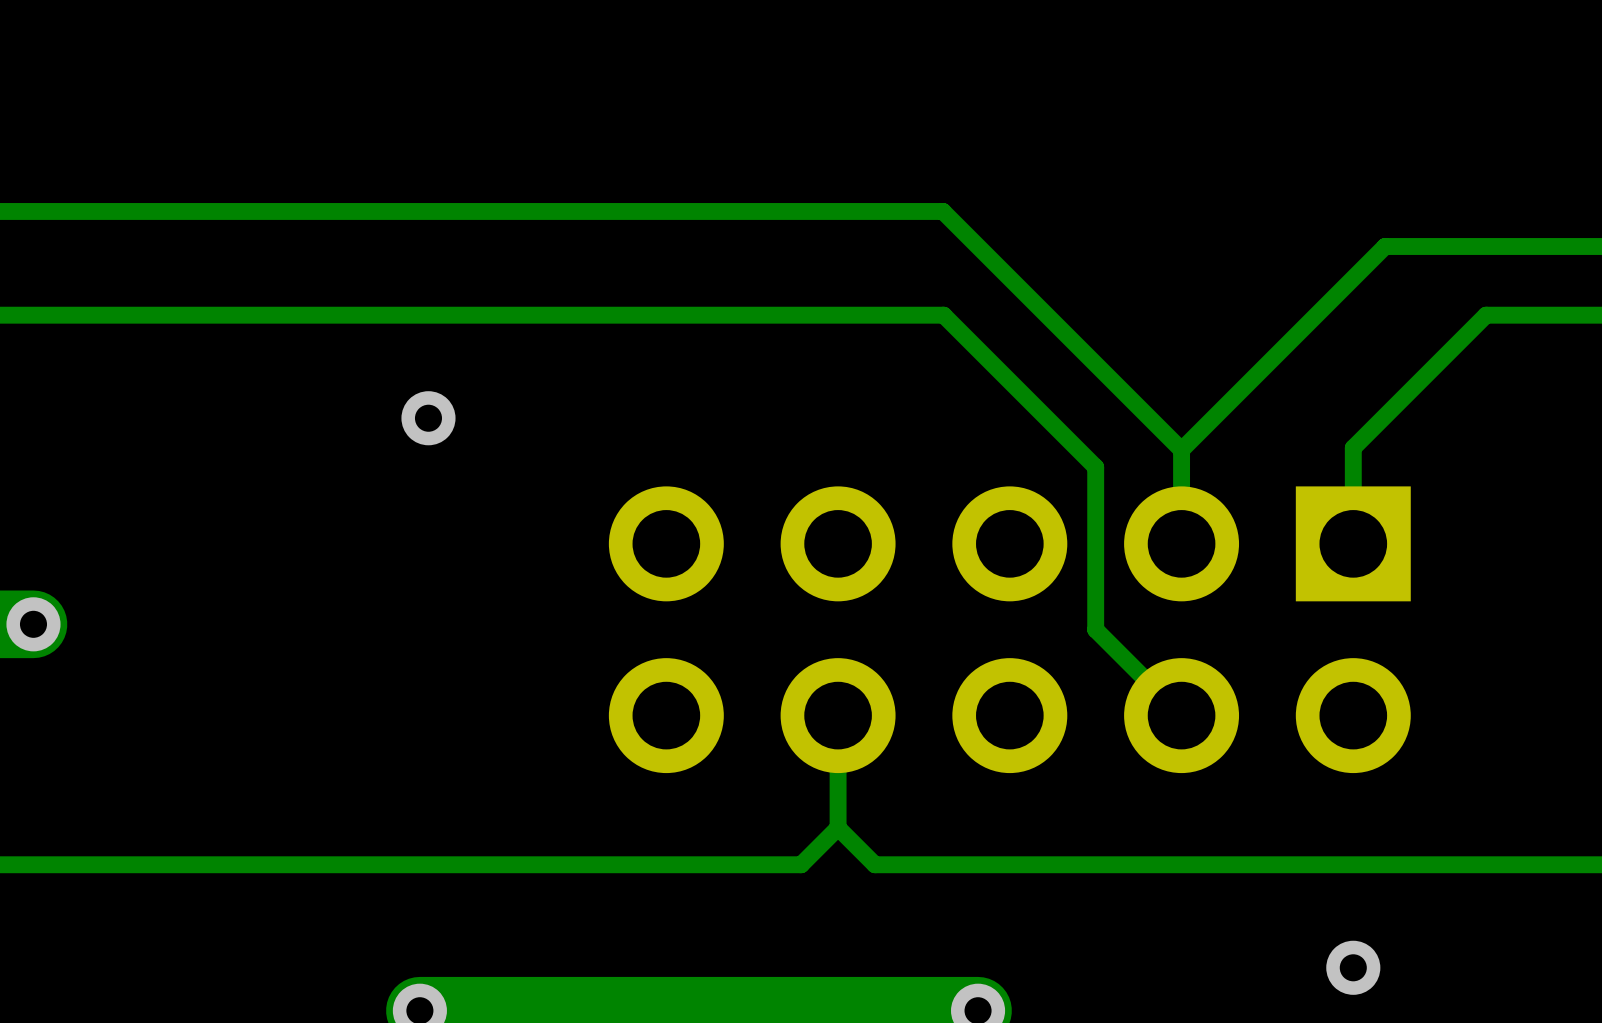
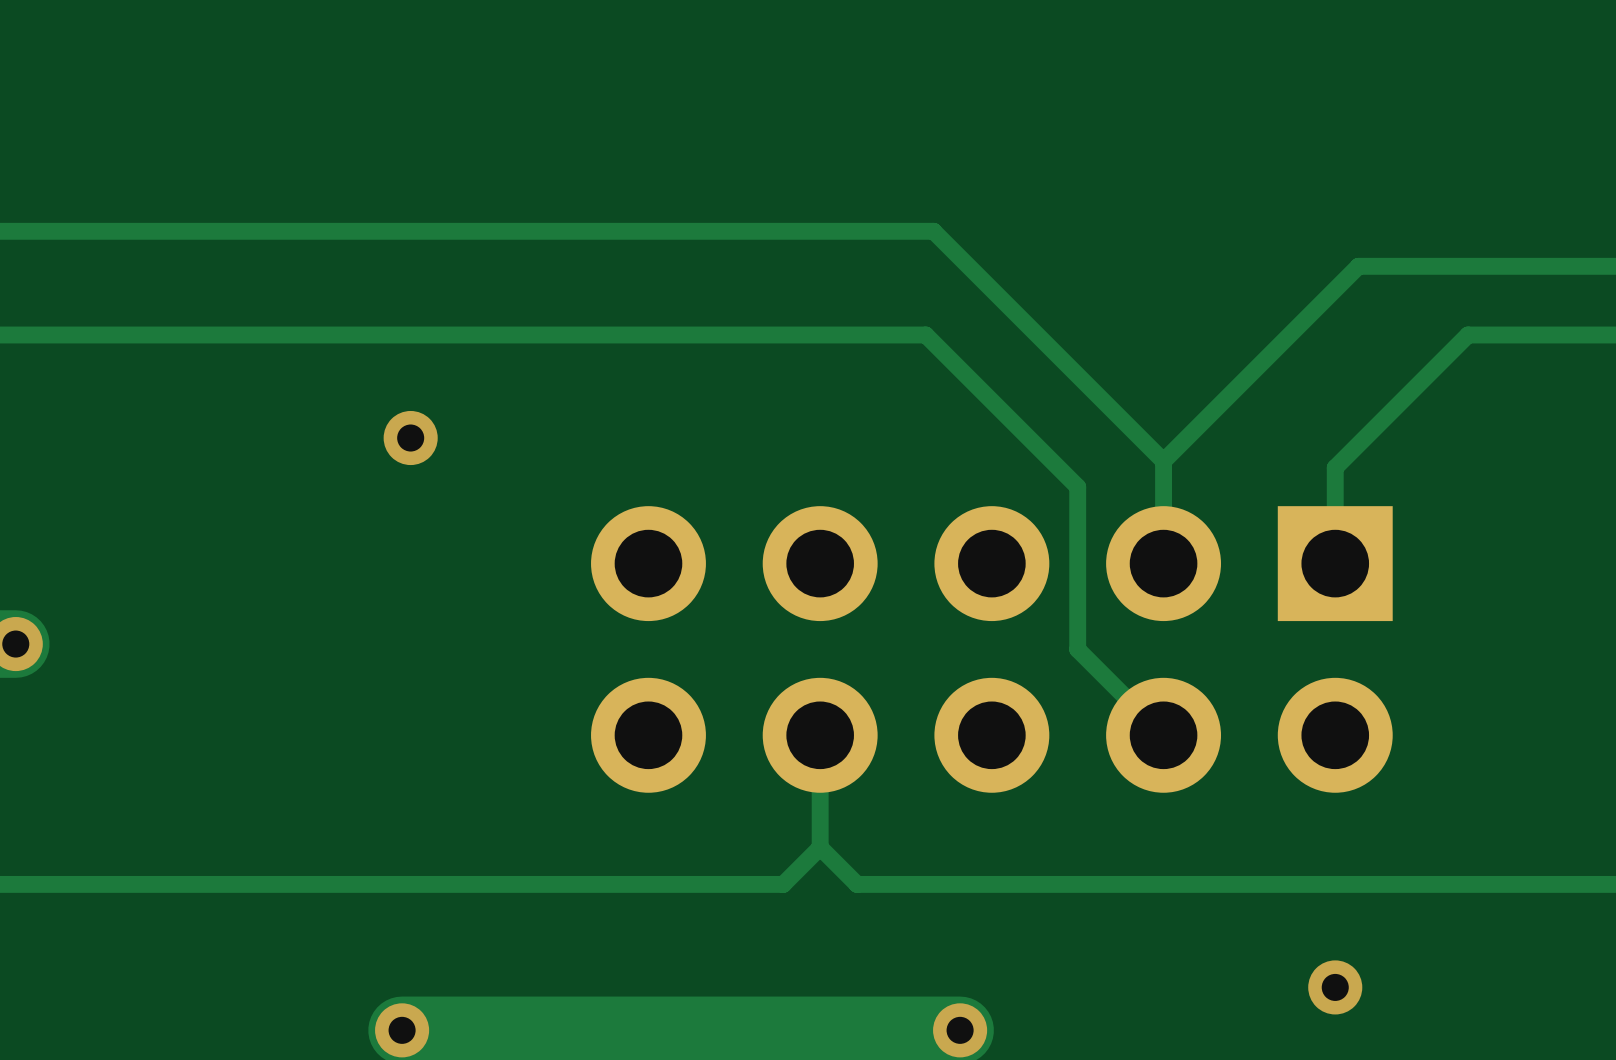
track: (943, 211) (1181, 450) (1385, 246) -> (925, 231) (933, 231) (1163, 461)
track: none -> (1367, 266) (1358, 266) (1163, 461)

